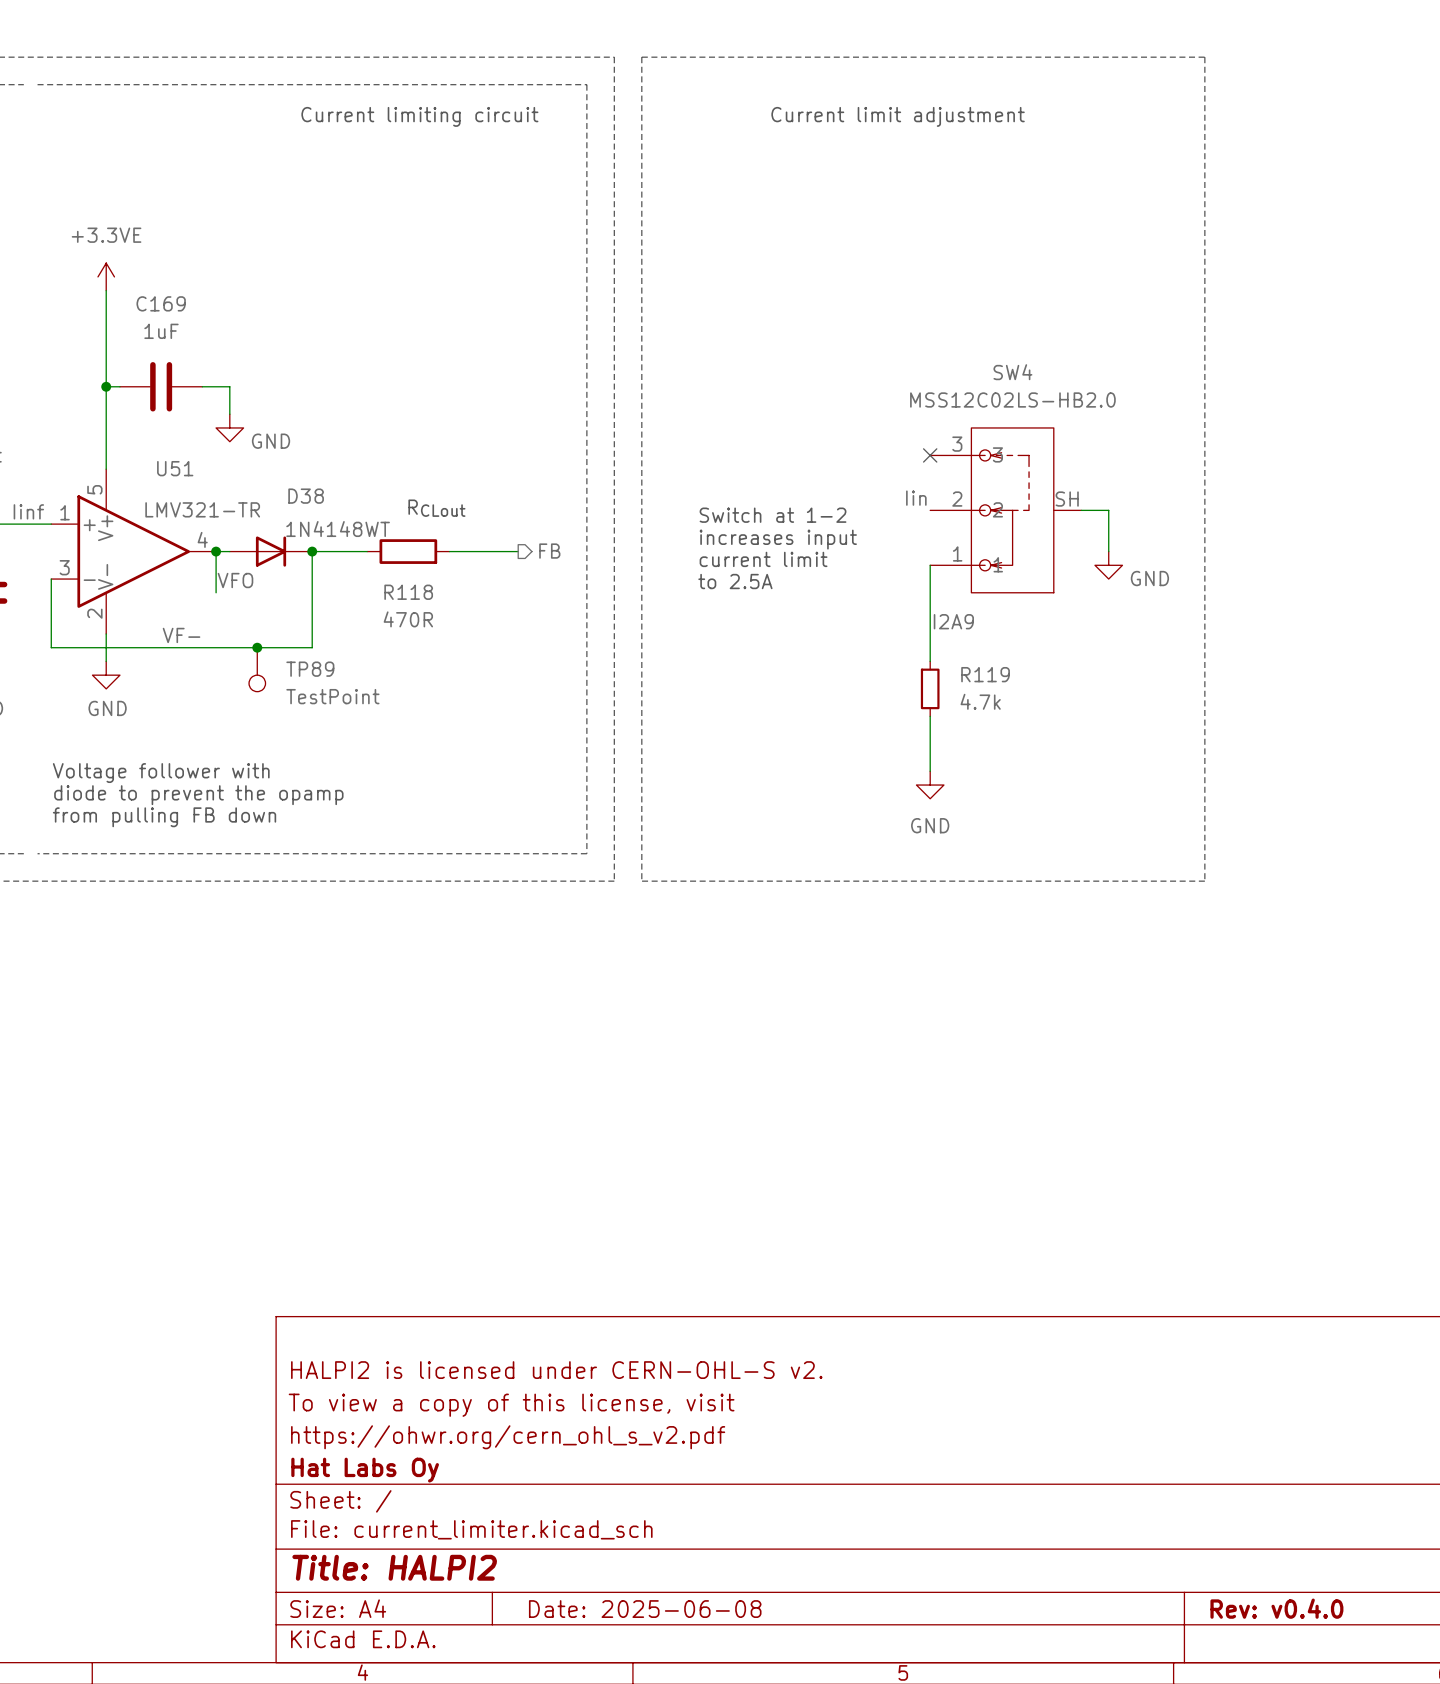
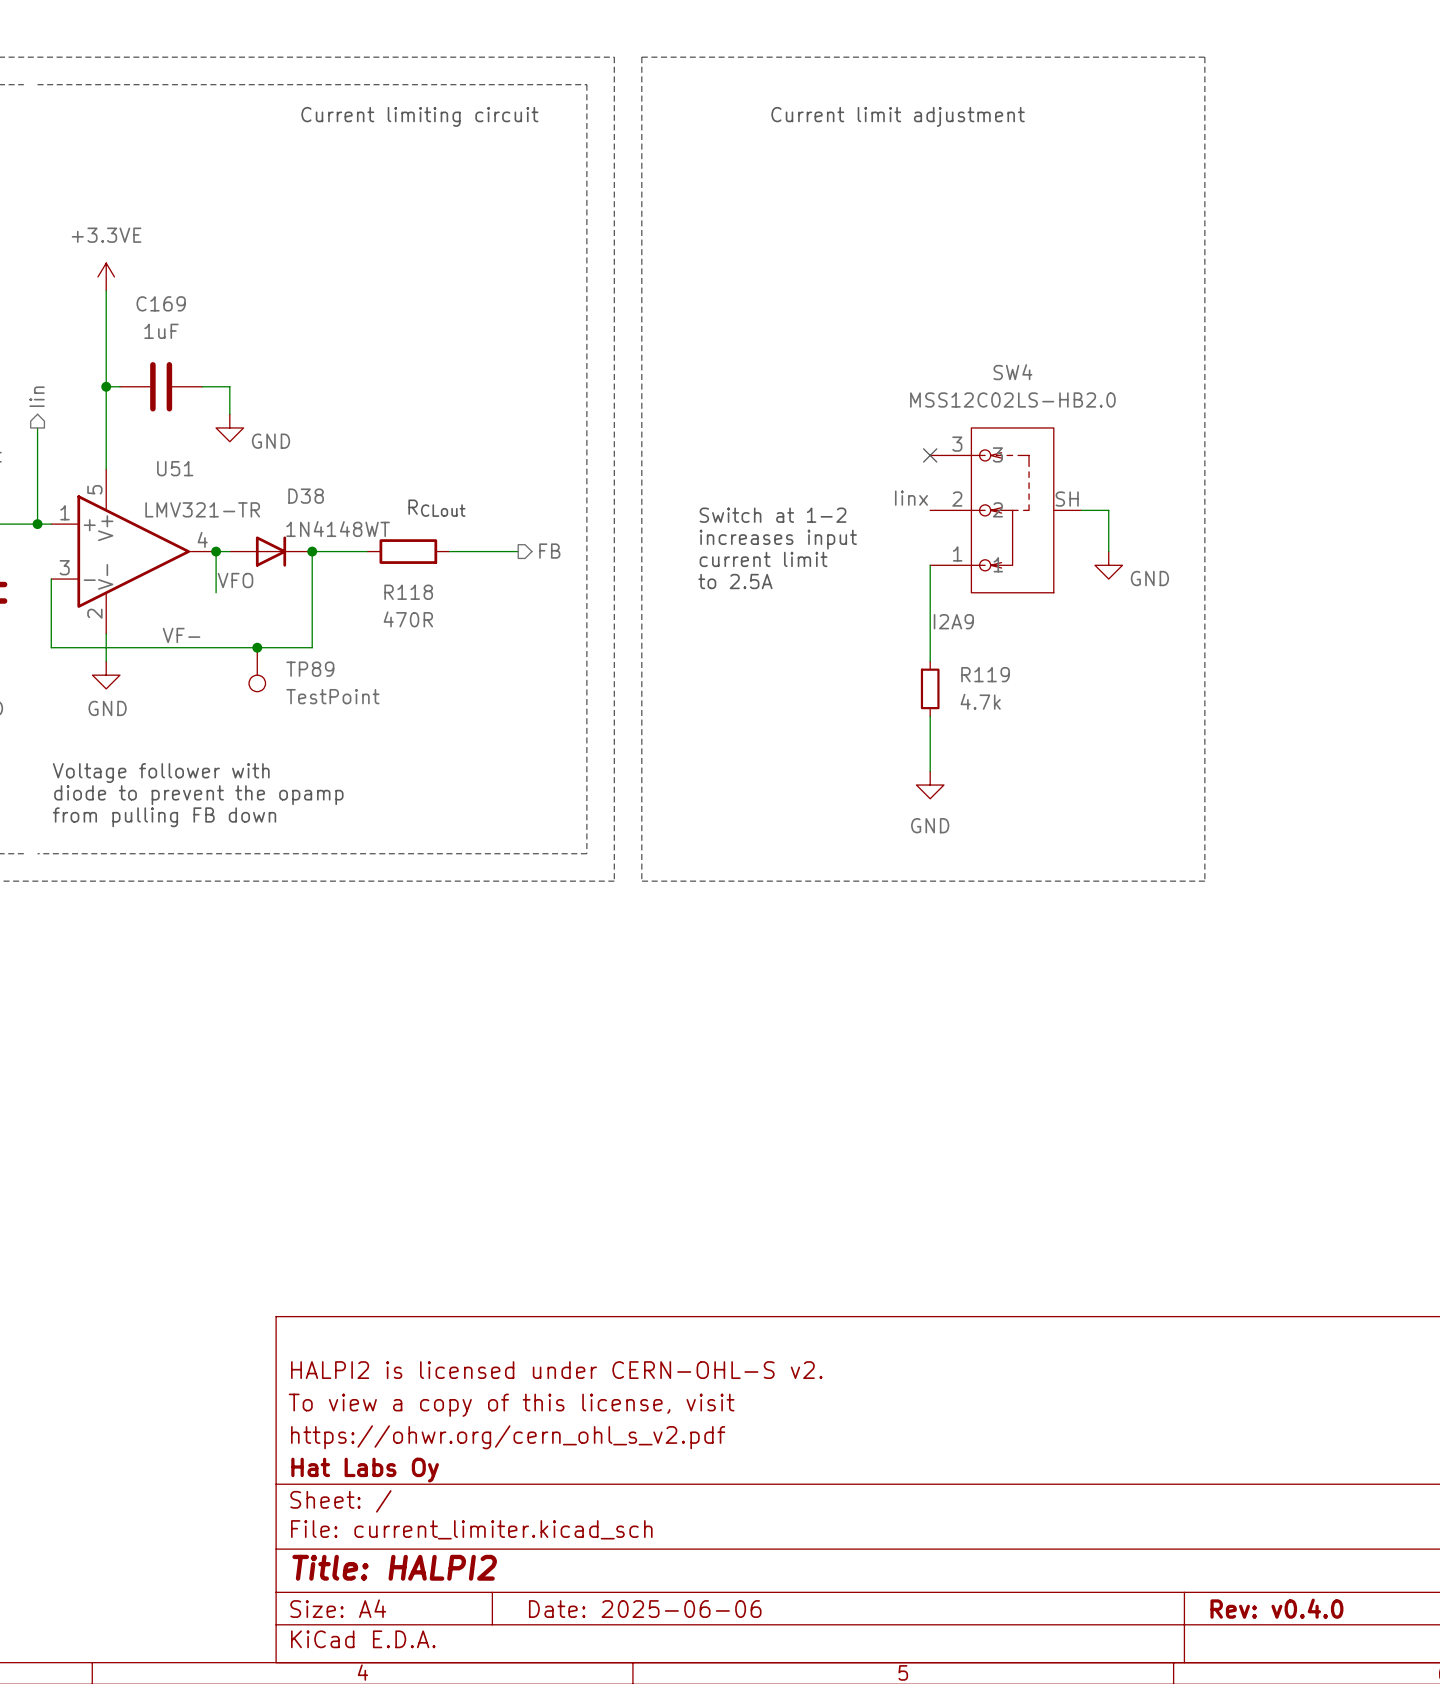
hierarchical label: none -> Iin (37, 396)
wire: none -> (37, 427) (37, 524)
label: Iin (916, 498) -> Iinx (911, 498)
label: Iinf (28, 511) -> none
junction: none -> (37, 524)
title block: Date: 2025-06-08 (645, 1609) -> Date: 2025-06-06 (645, 1609)

